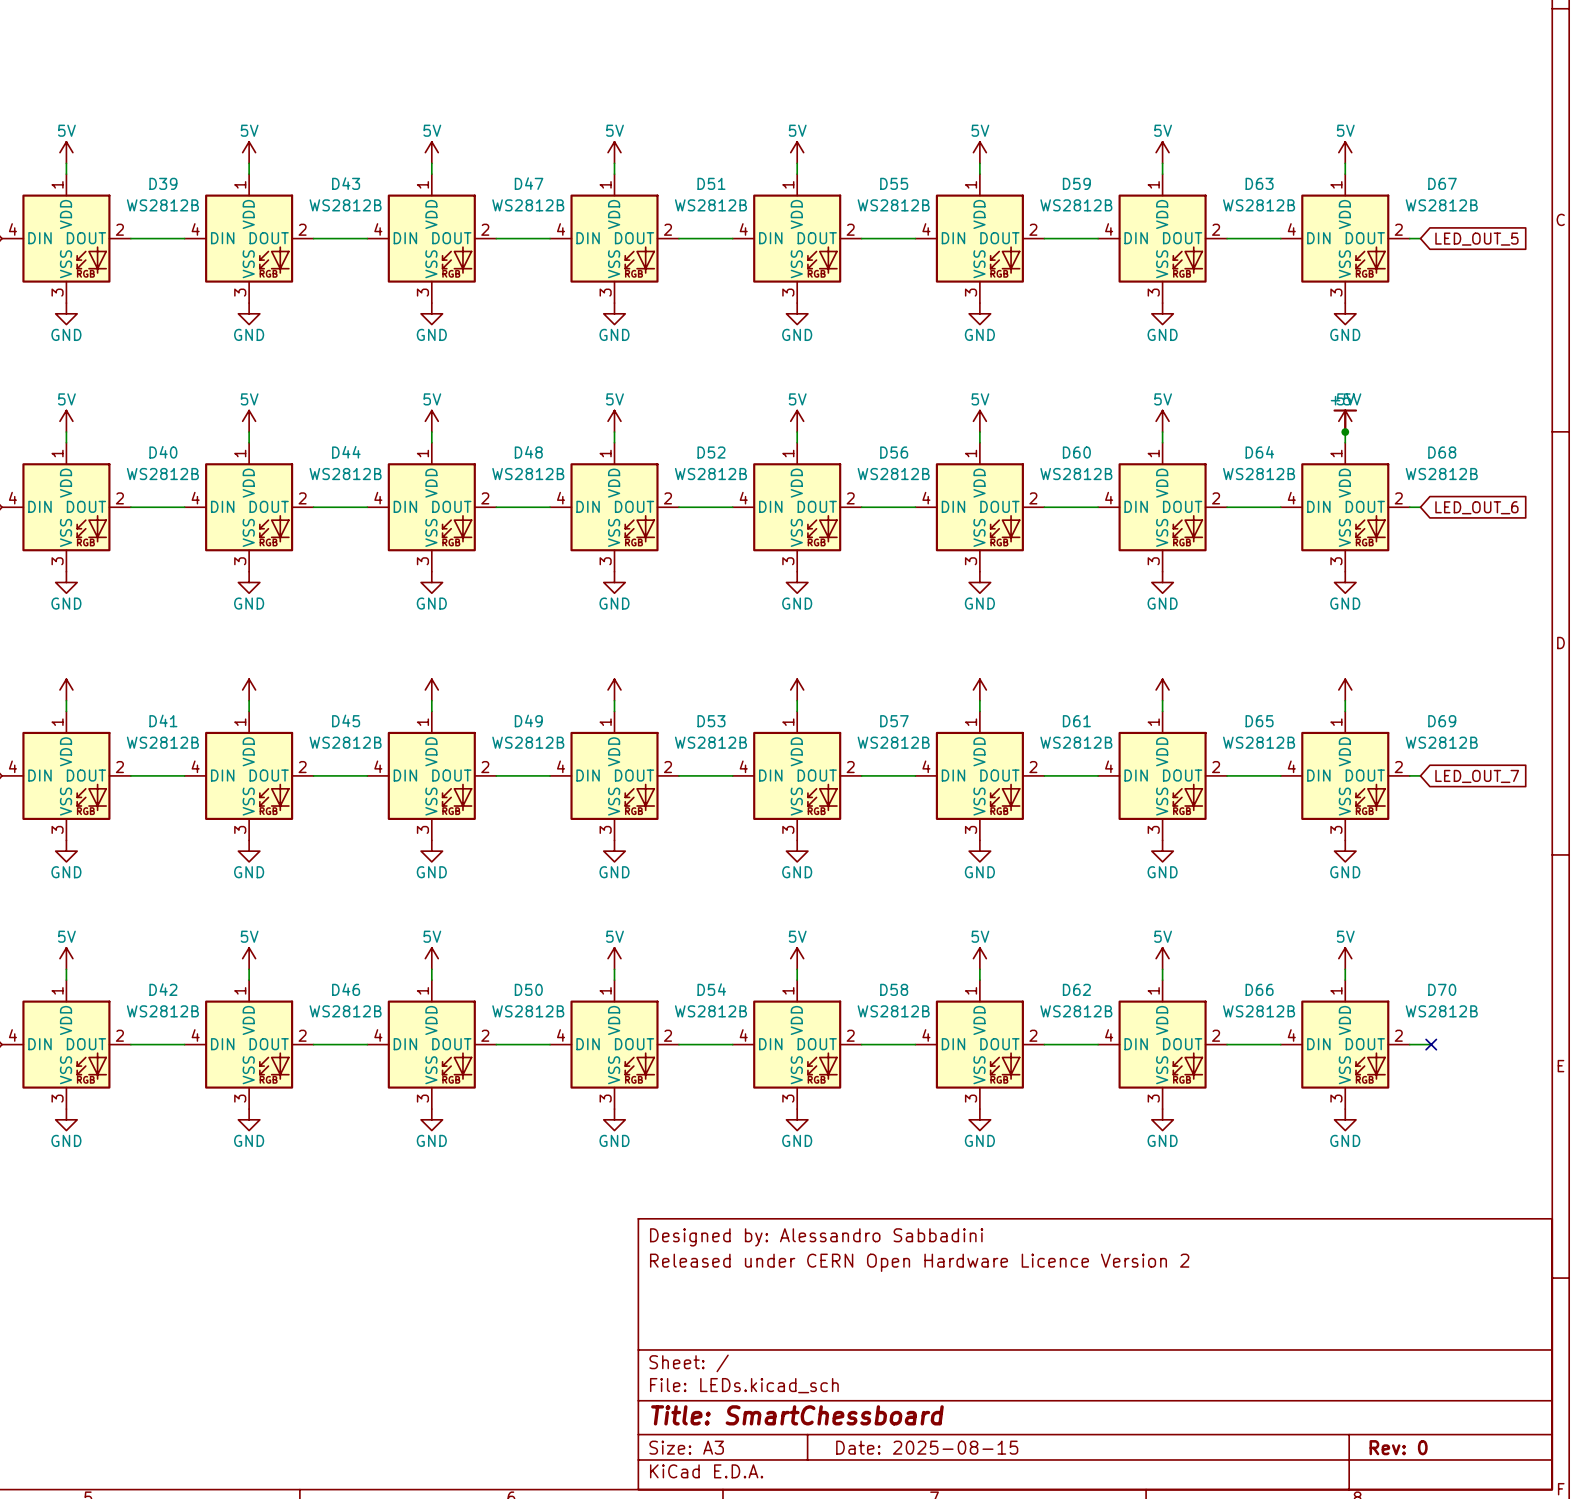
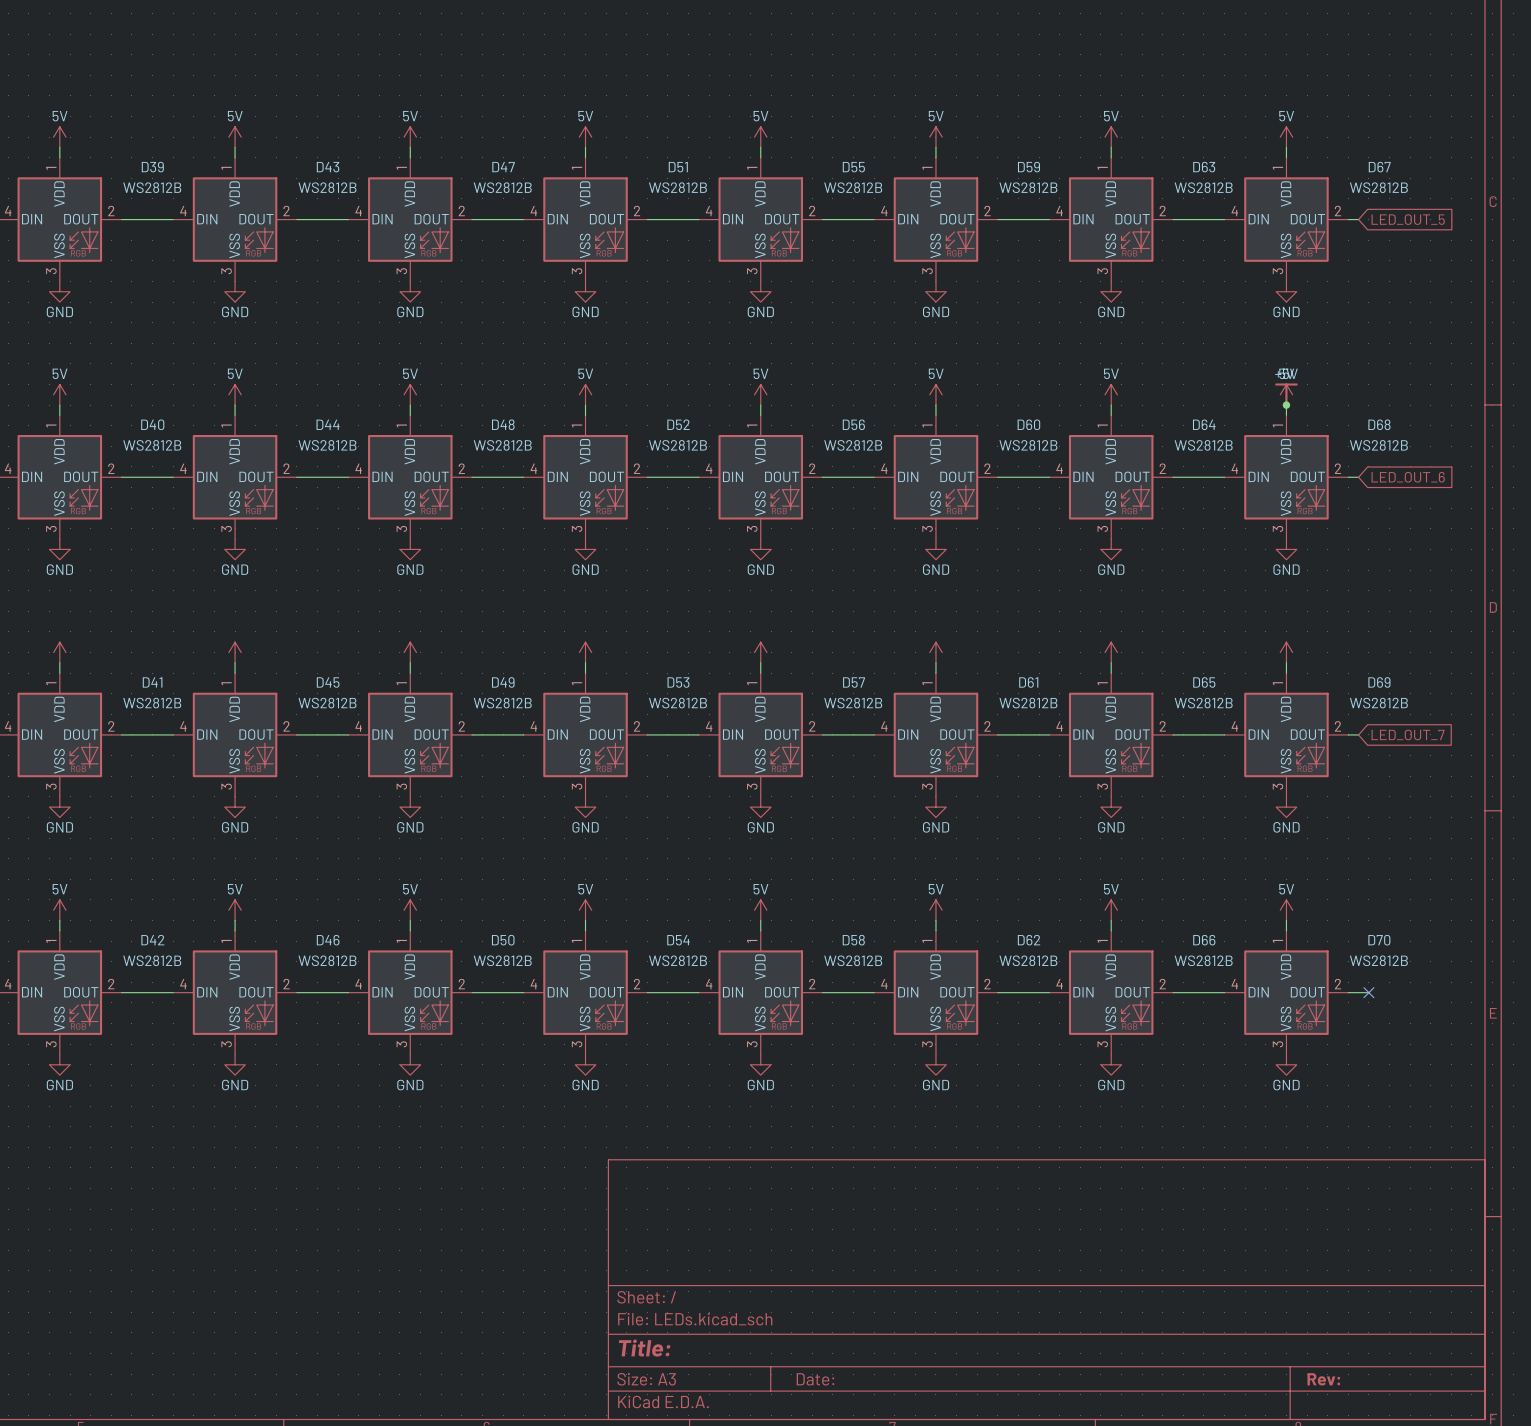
title block: Designed by: Alessandro Sabbadini (816, 1237) -> none
title block: Released under CERN Open Hardware Licence Version 2 (919, 1262) -> none
title block: Title: SmartChessboard (797, 1415) -> Title: (644, 1348)
title block: Date: 2025-08-15 (927, 1447) -> Date: (815, 1379)
title block: Rev: 0 (1398, 1447) -> Rev: (1323, 1379)

